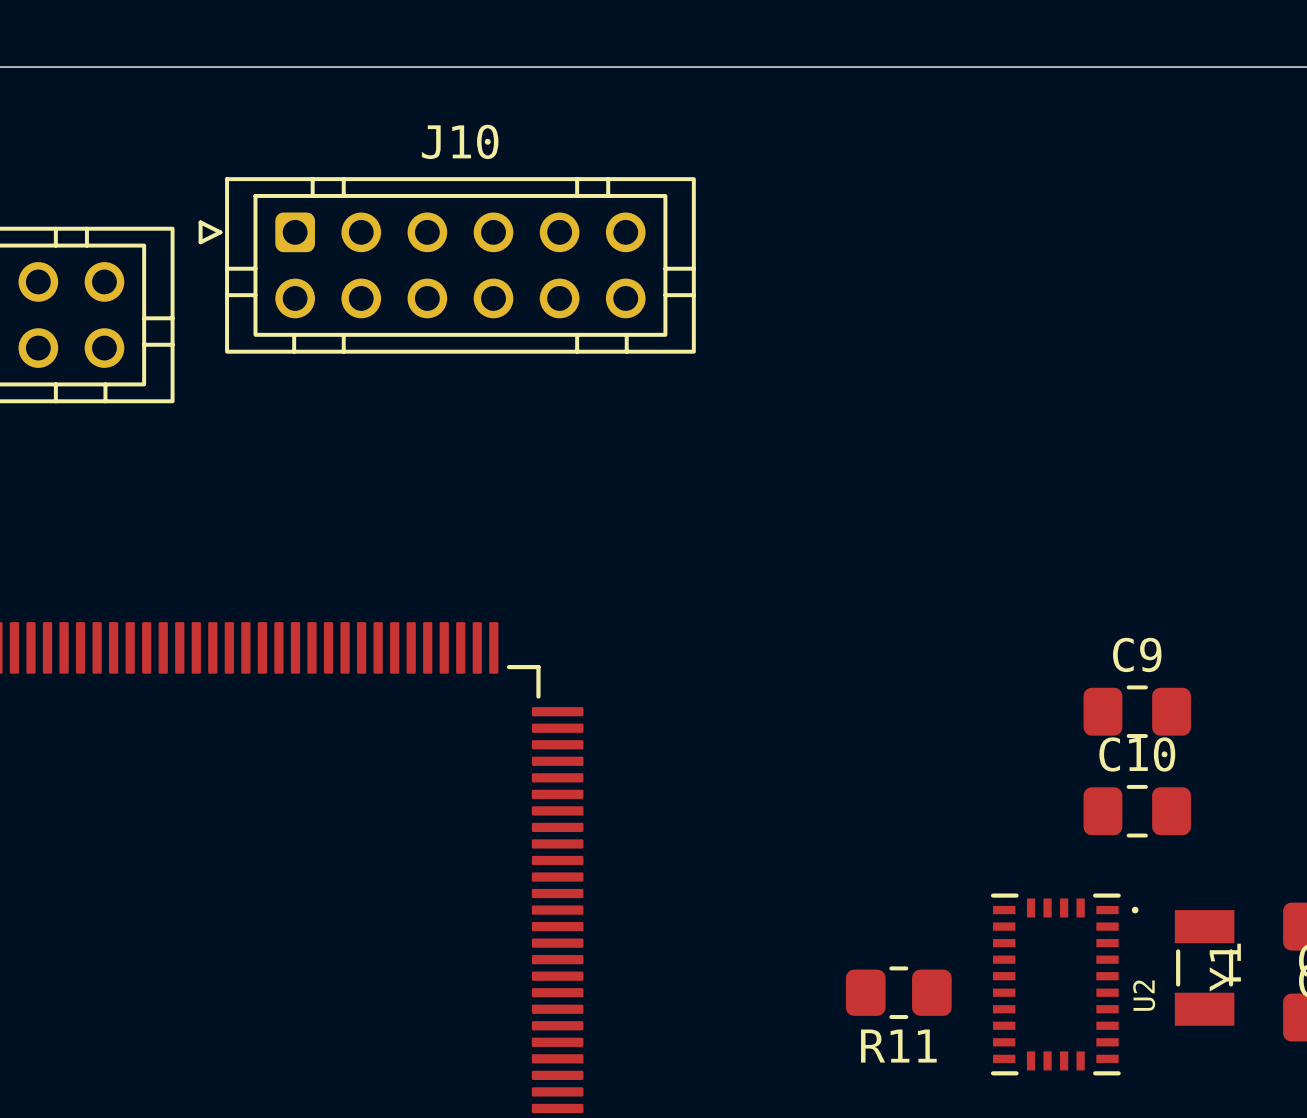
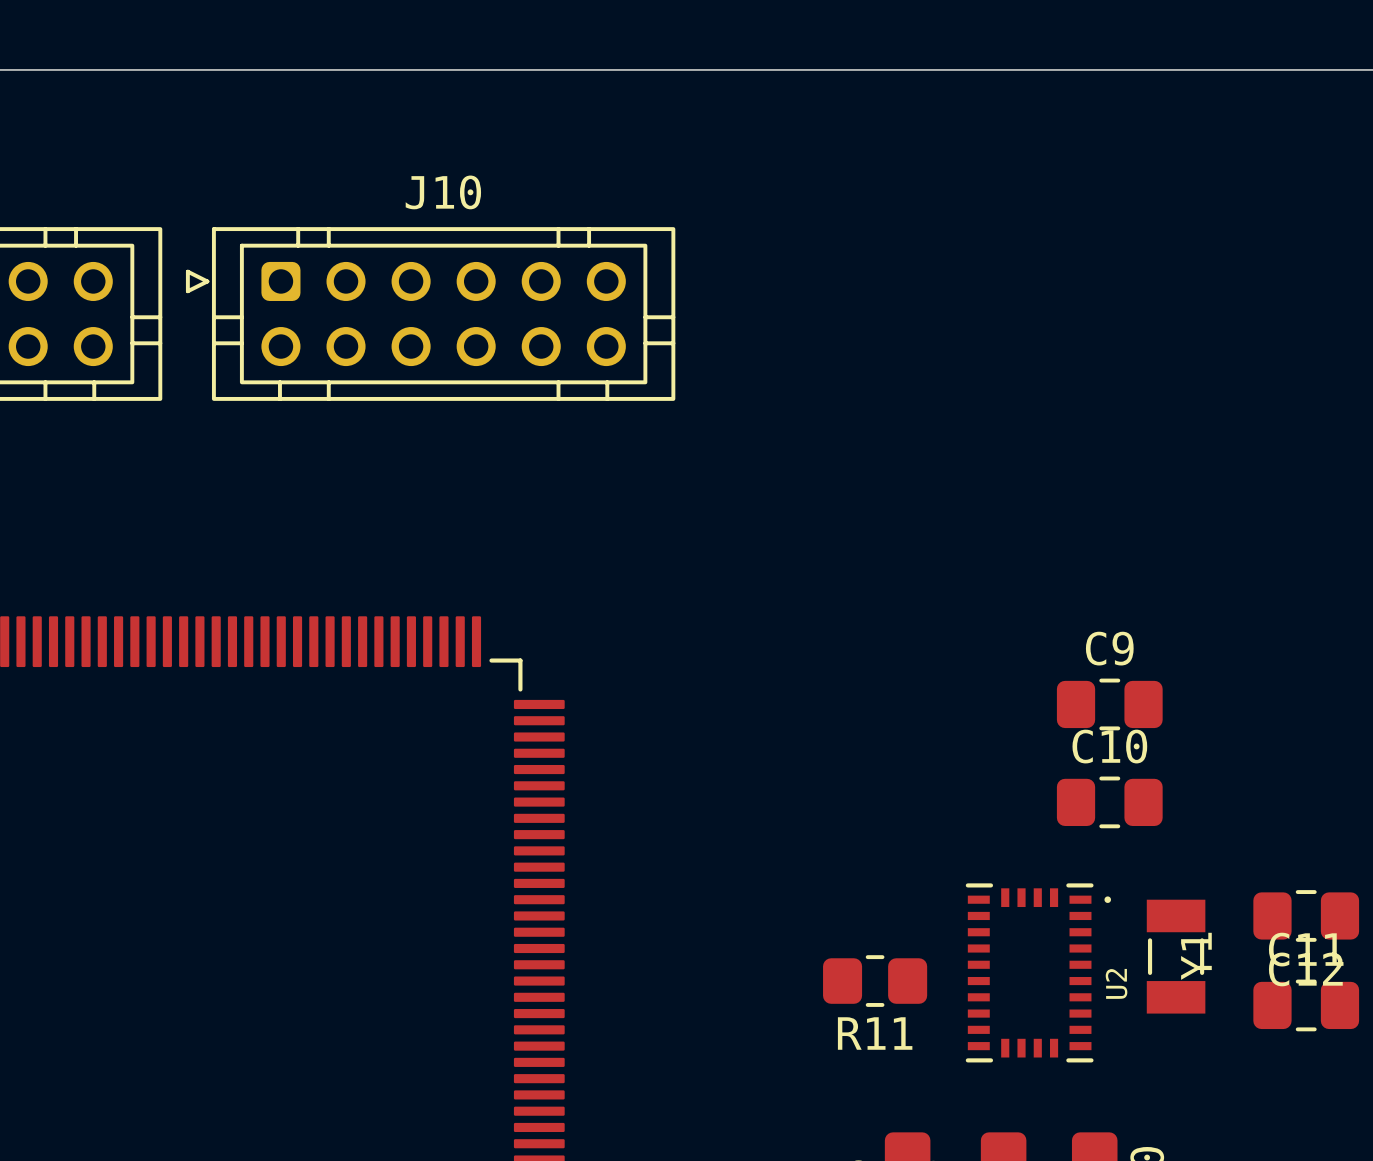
J10 position: (447, 265) -> (430, 314)

